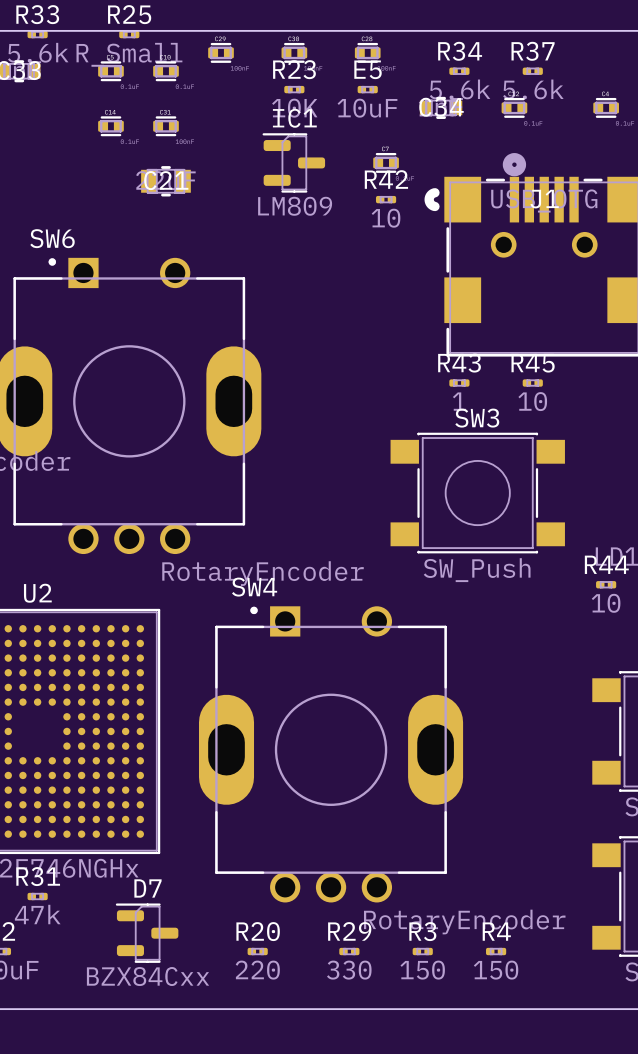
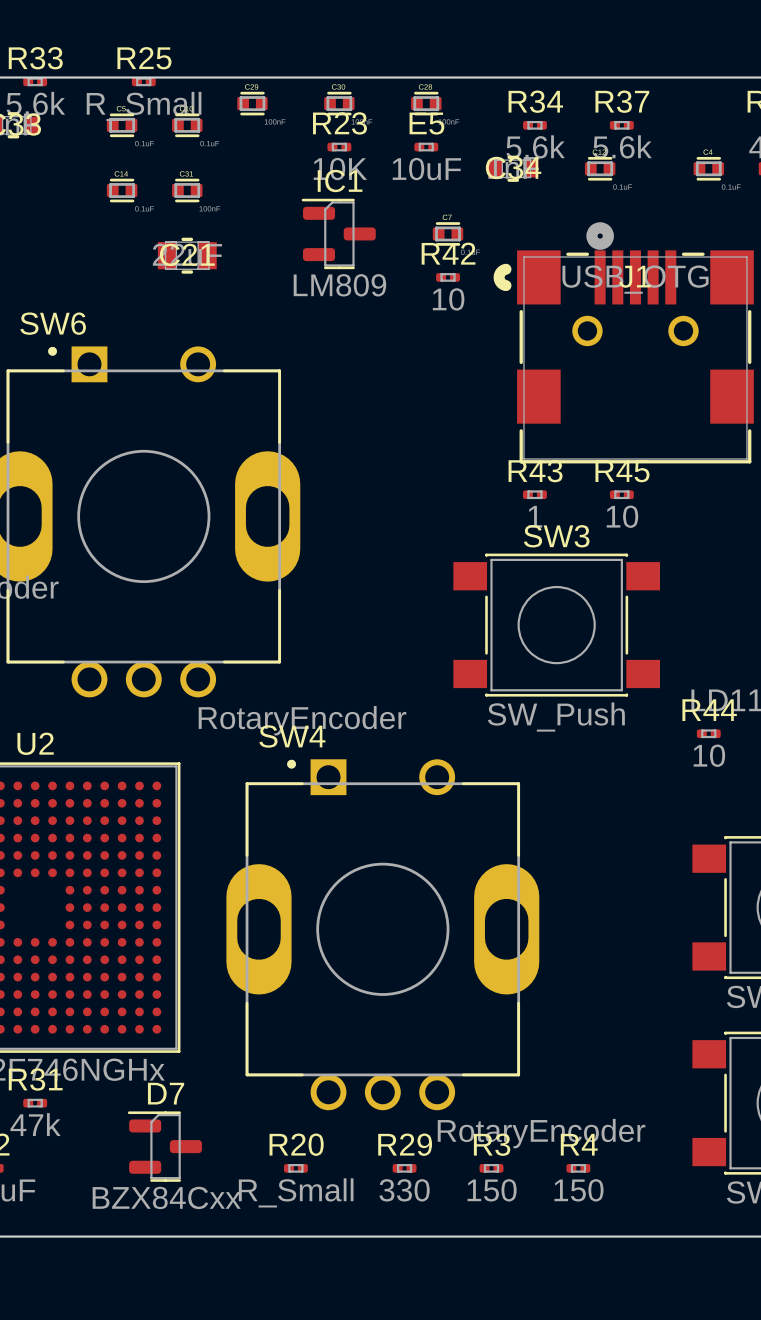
R20 value: 220 (257, 970) -> R_Small (296, 1192)

